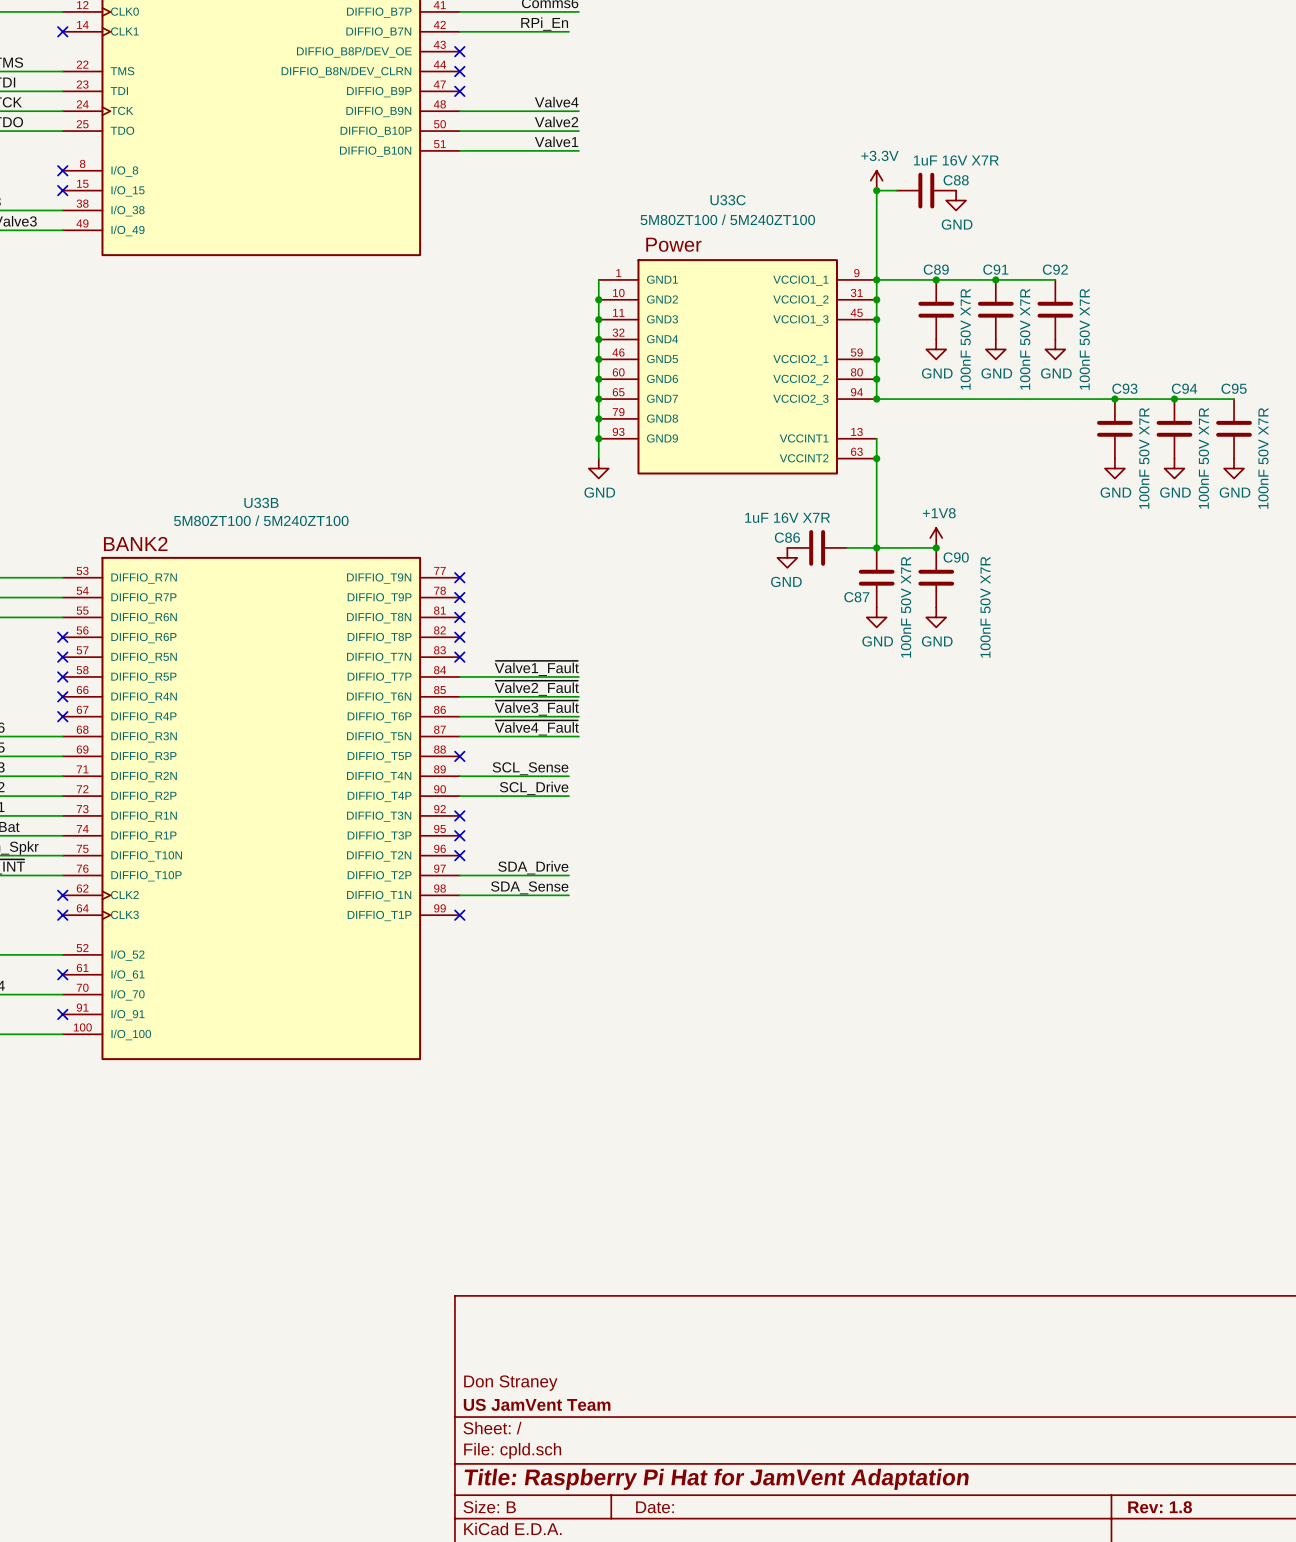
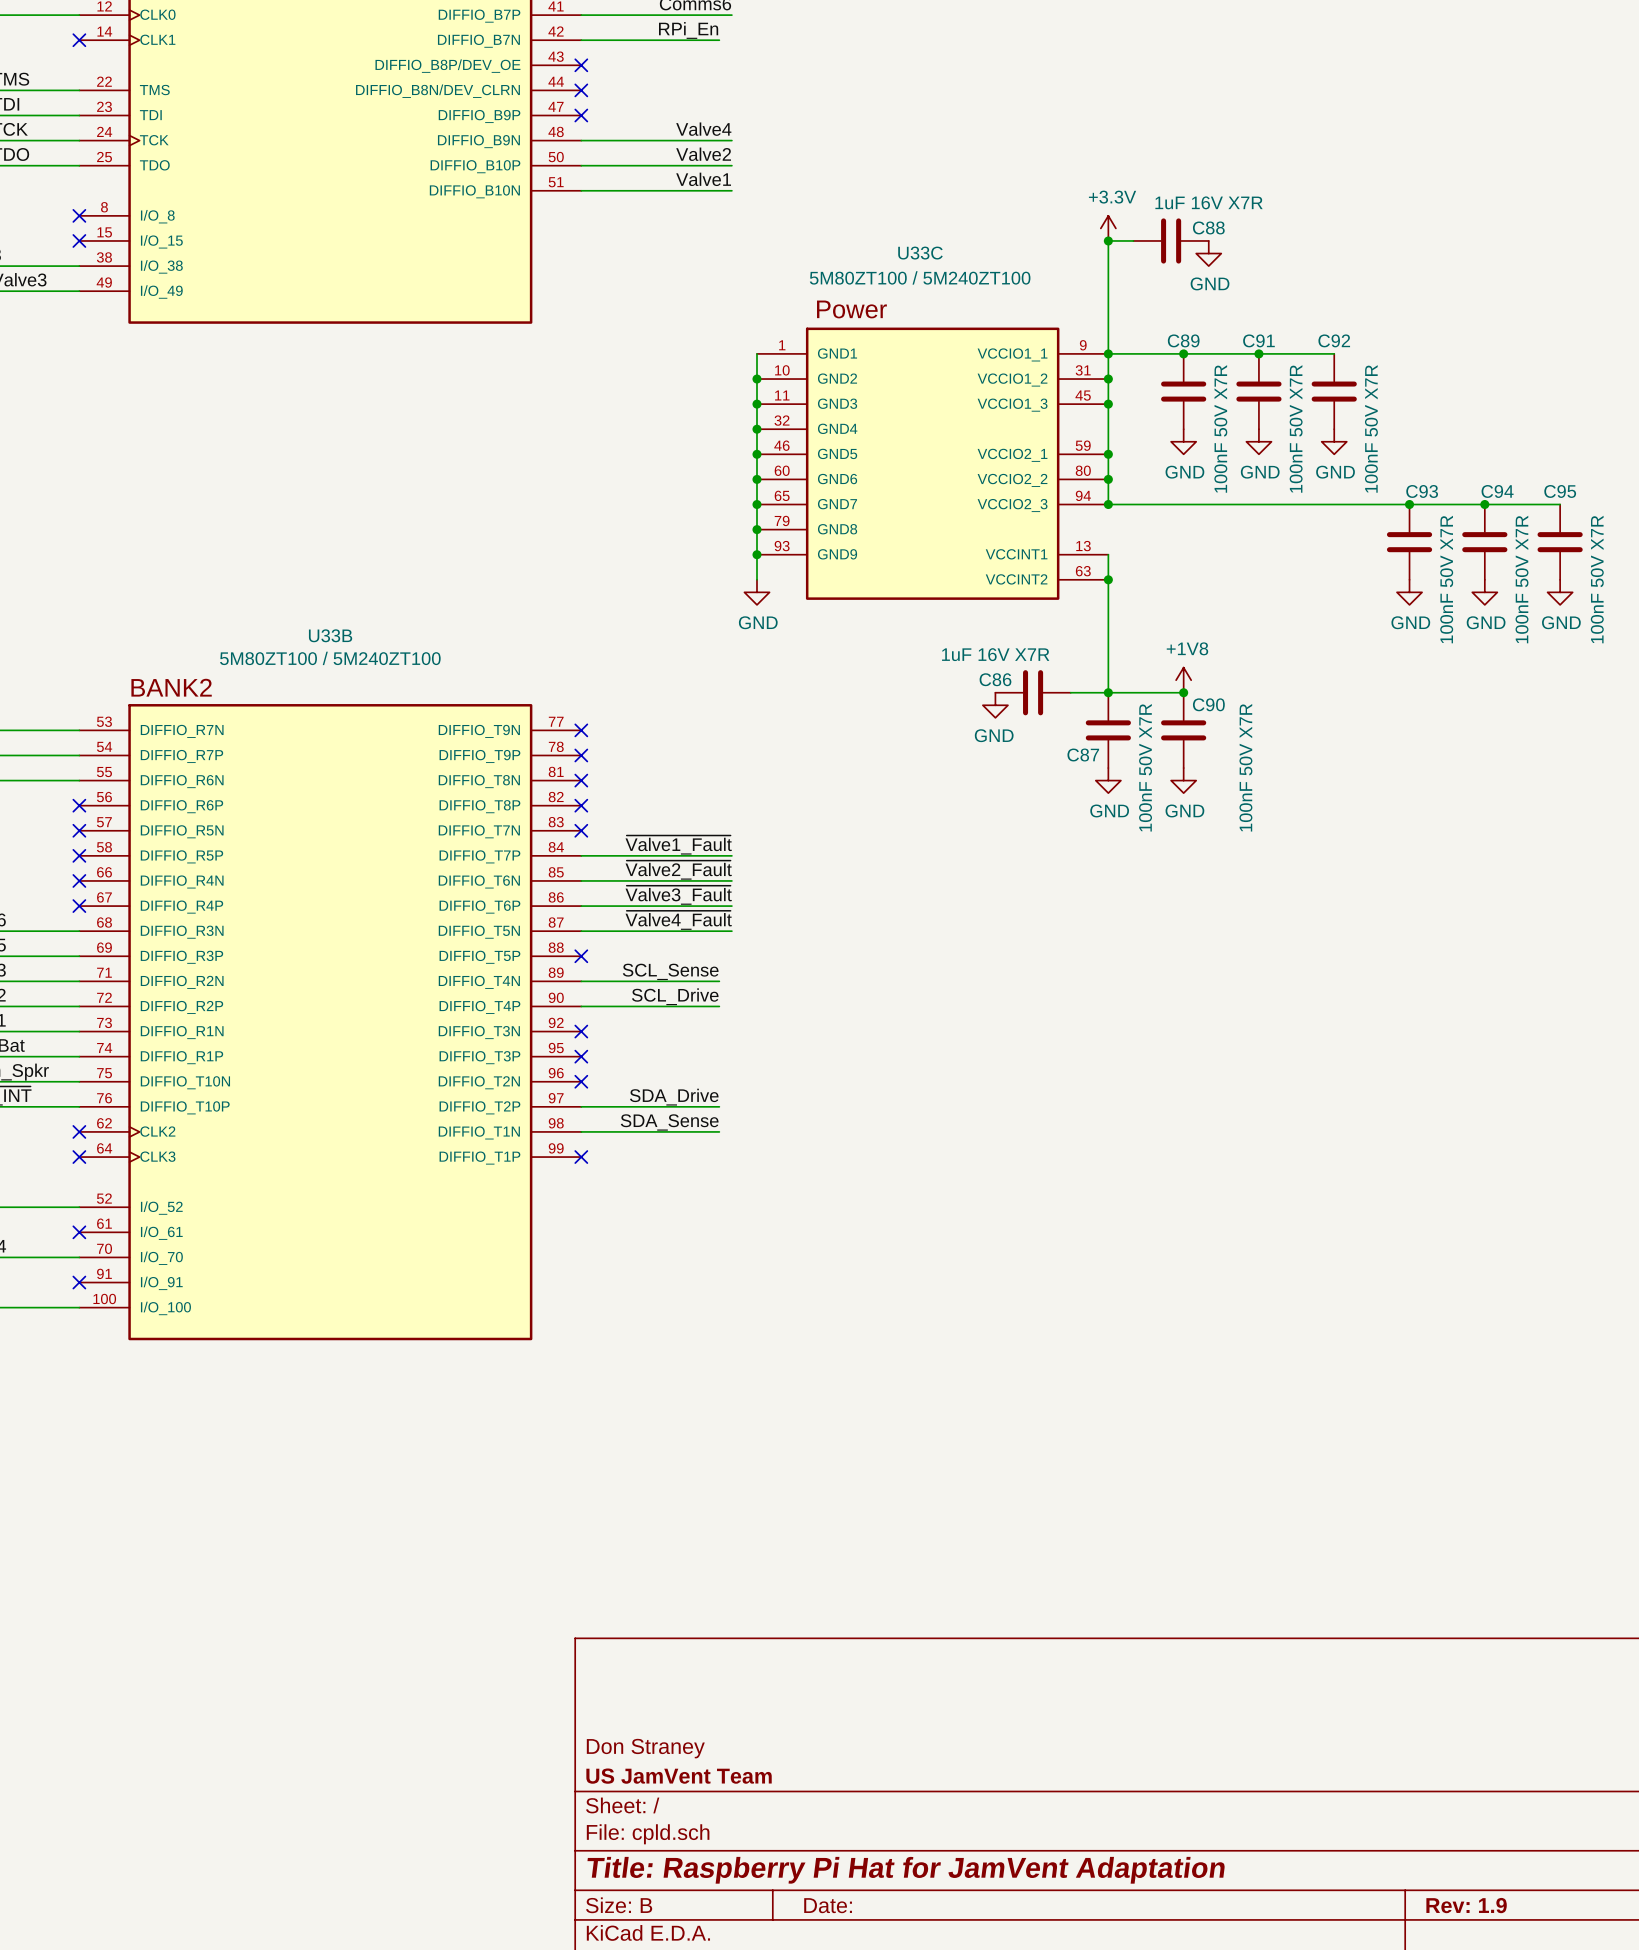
title block: Rev: 1.8 (1160, 1507) -> Rev: 1.9 (1466, 1905)

